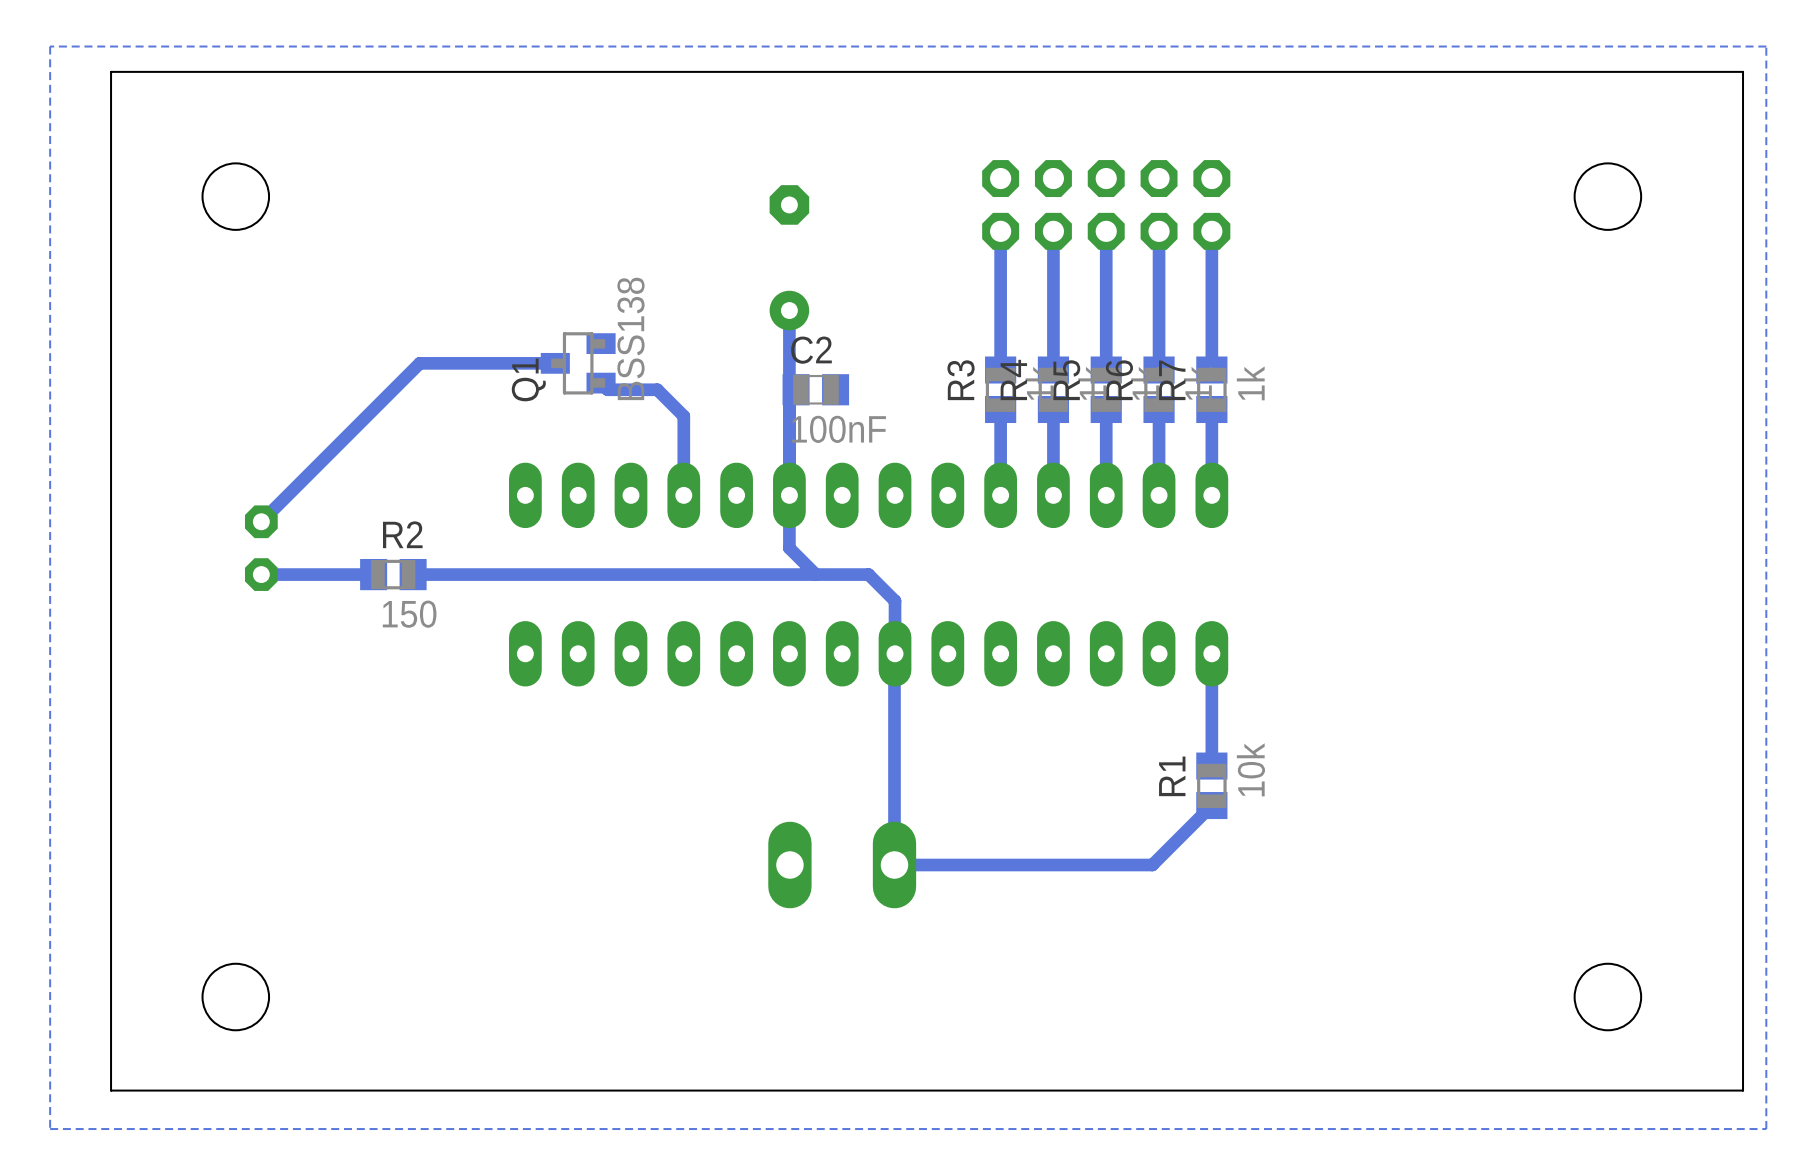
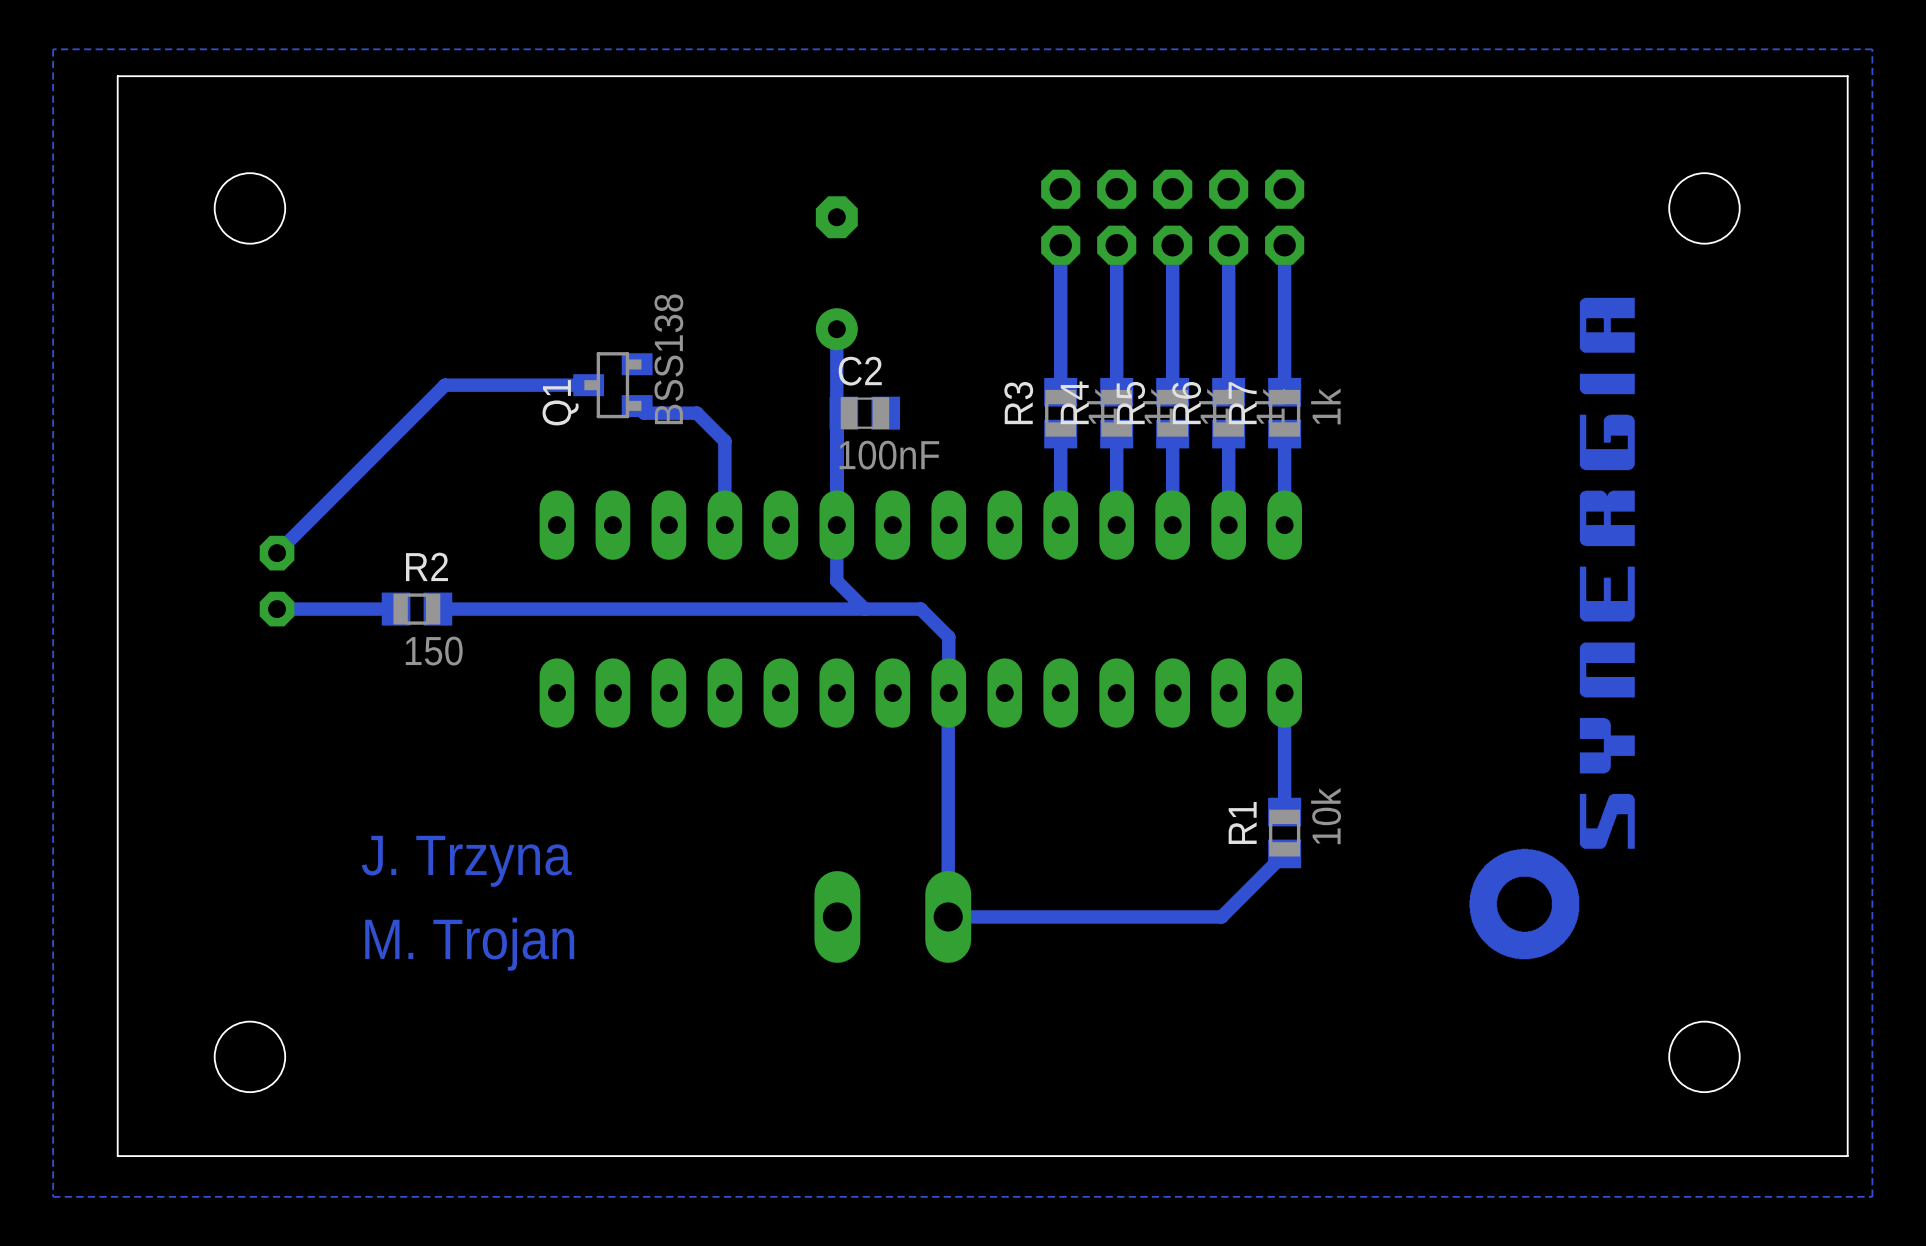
drawing: none -> [1469, 297, 1635, 960]
text: none -> J. Trzyna (466, 861)
text: none -> M. Trojan (469, 944)

